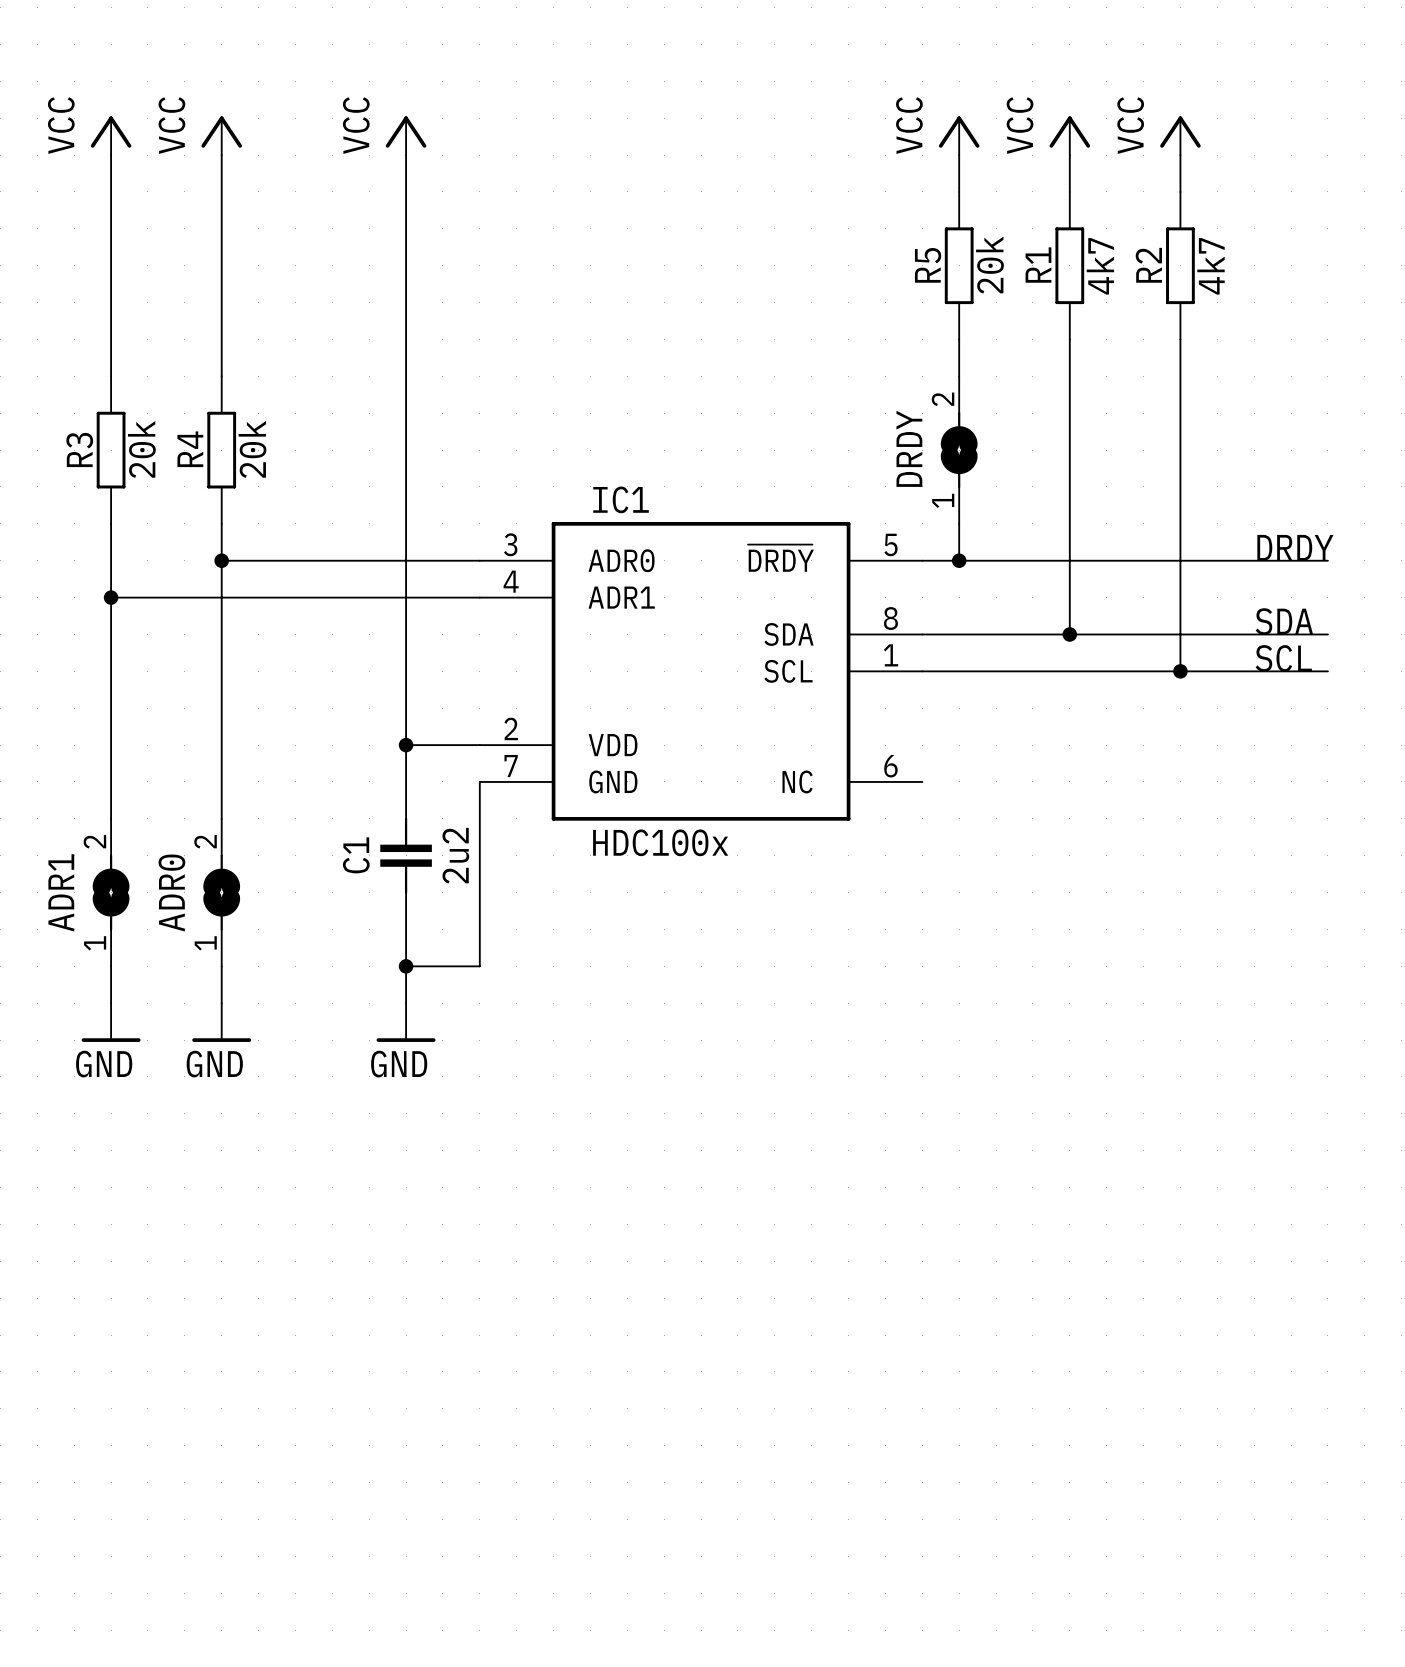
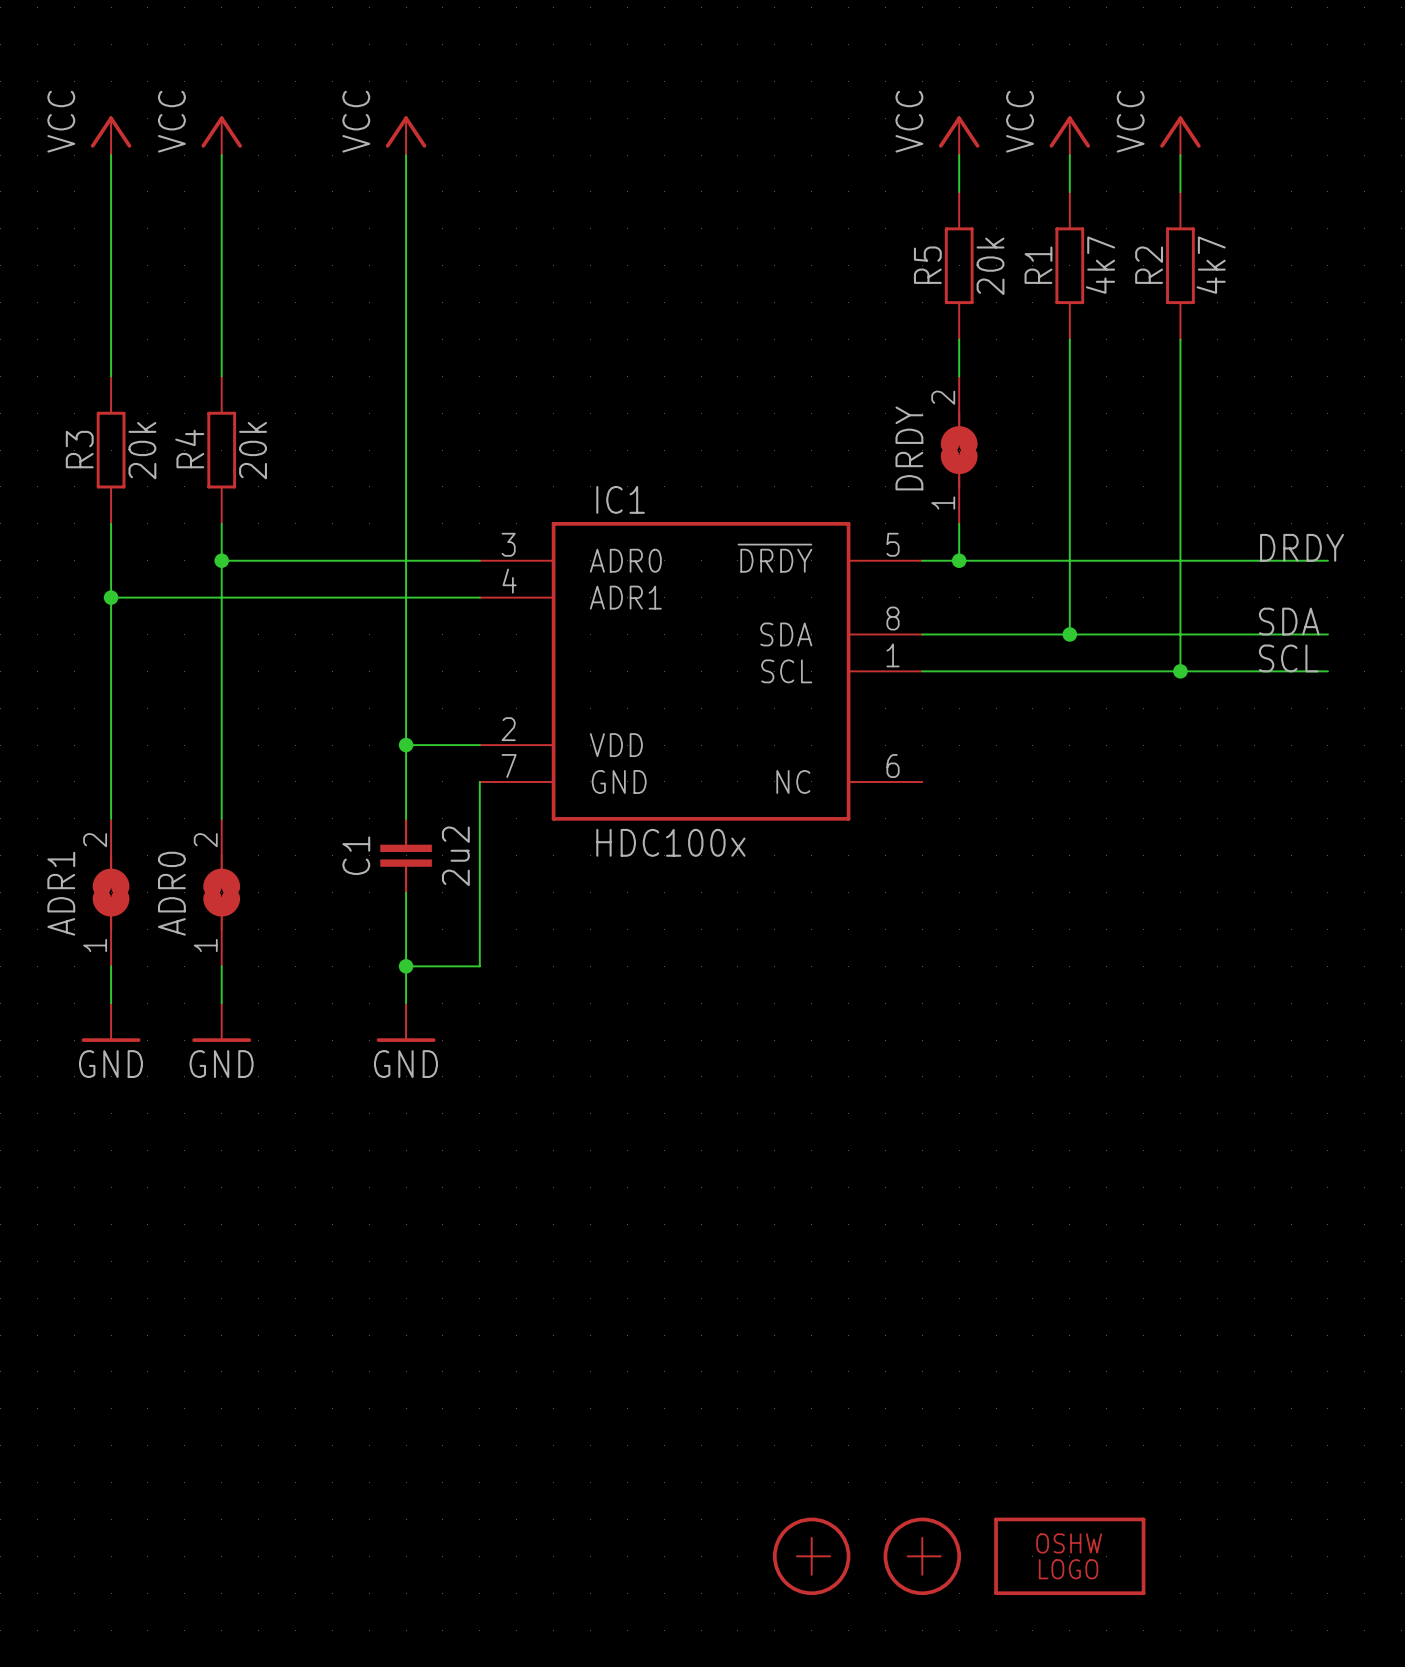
part: none -> (811, 1556)
part: none -> (922, 1556)
part: none -> (1069, 1556)

